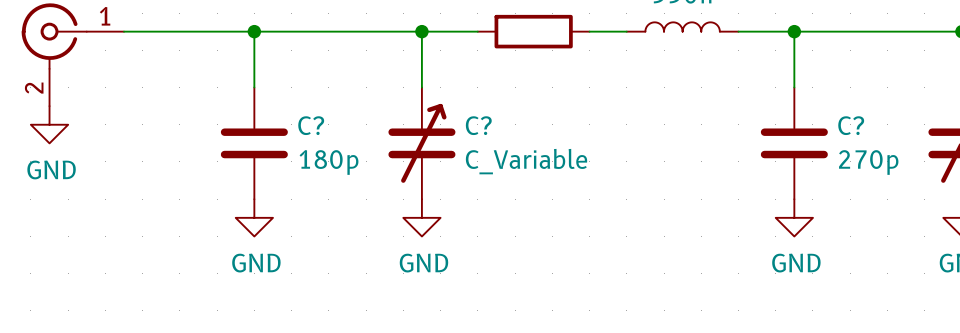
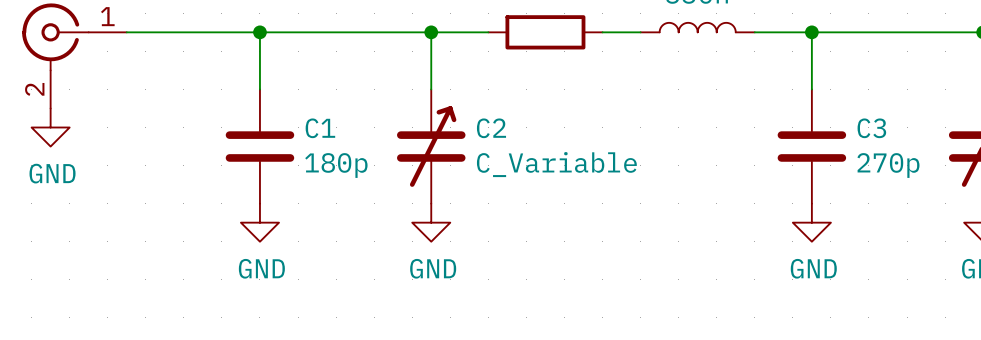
C? name: C? (311, 125) -> C1 (320, 128)
C? name: C? (478, 125) -> C2 (491, 128)
C? name: C? (851, 125) -> C3 (871, 128)

